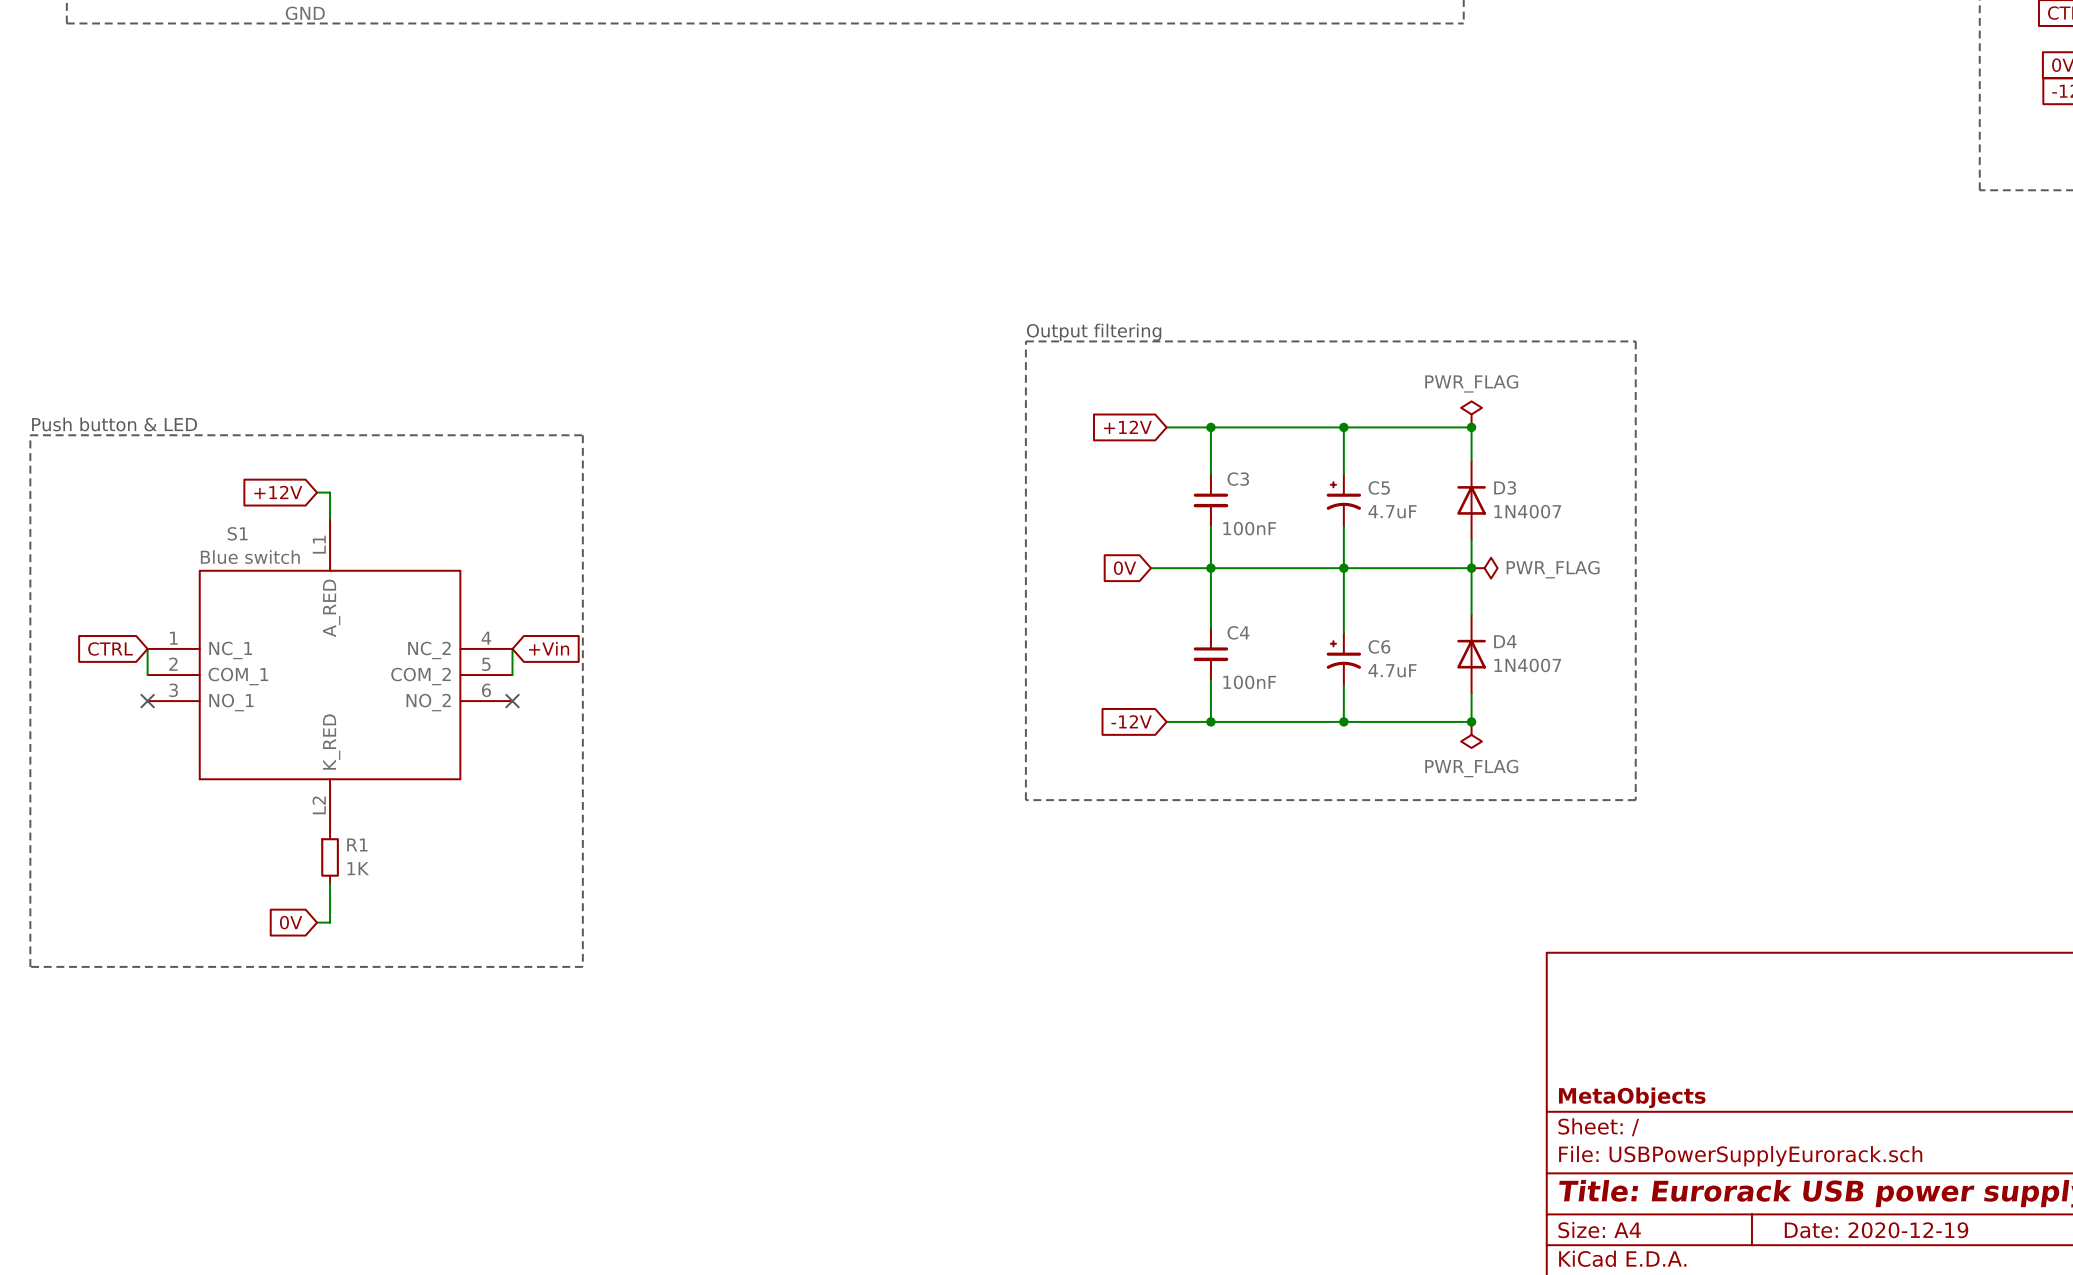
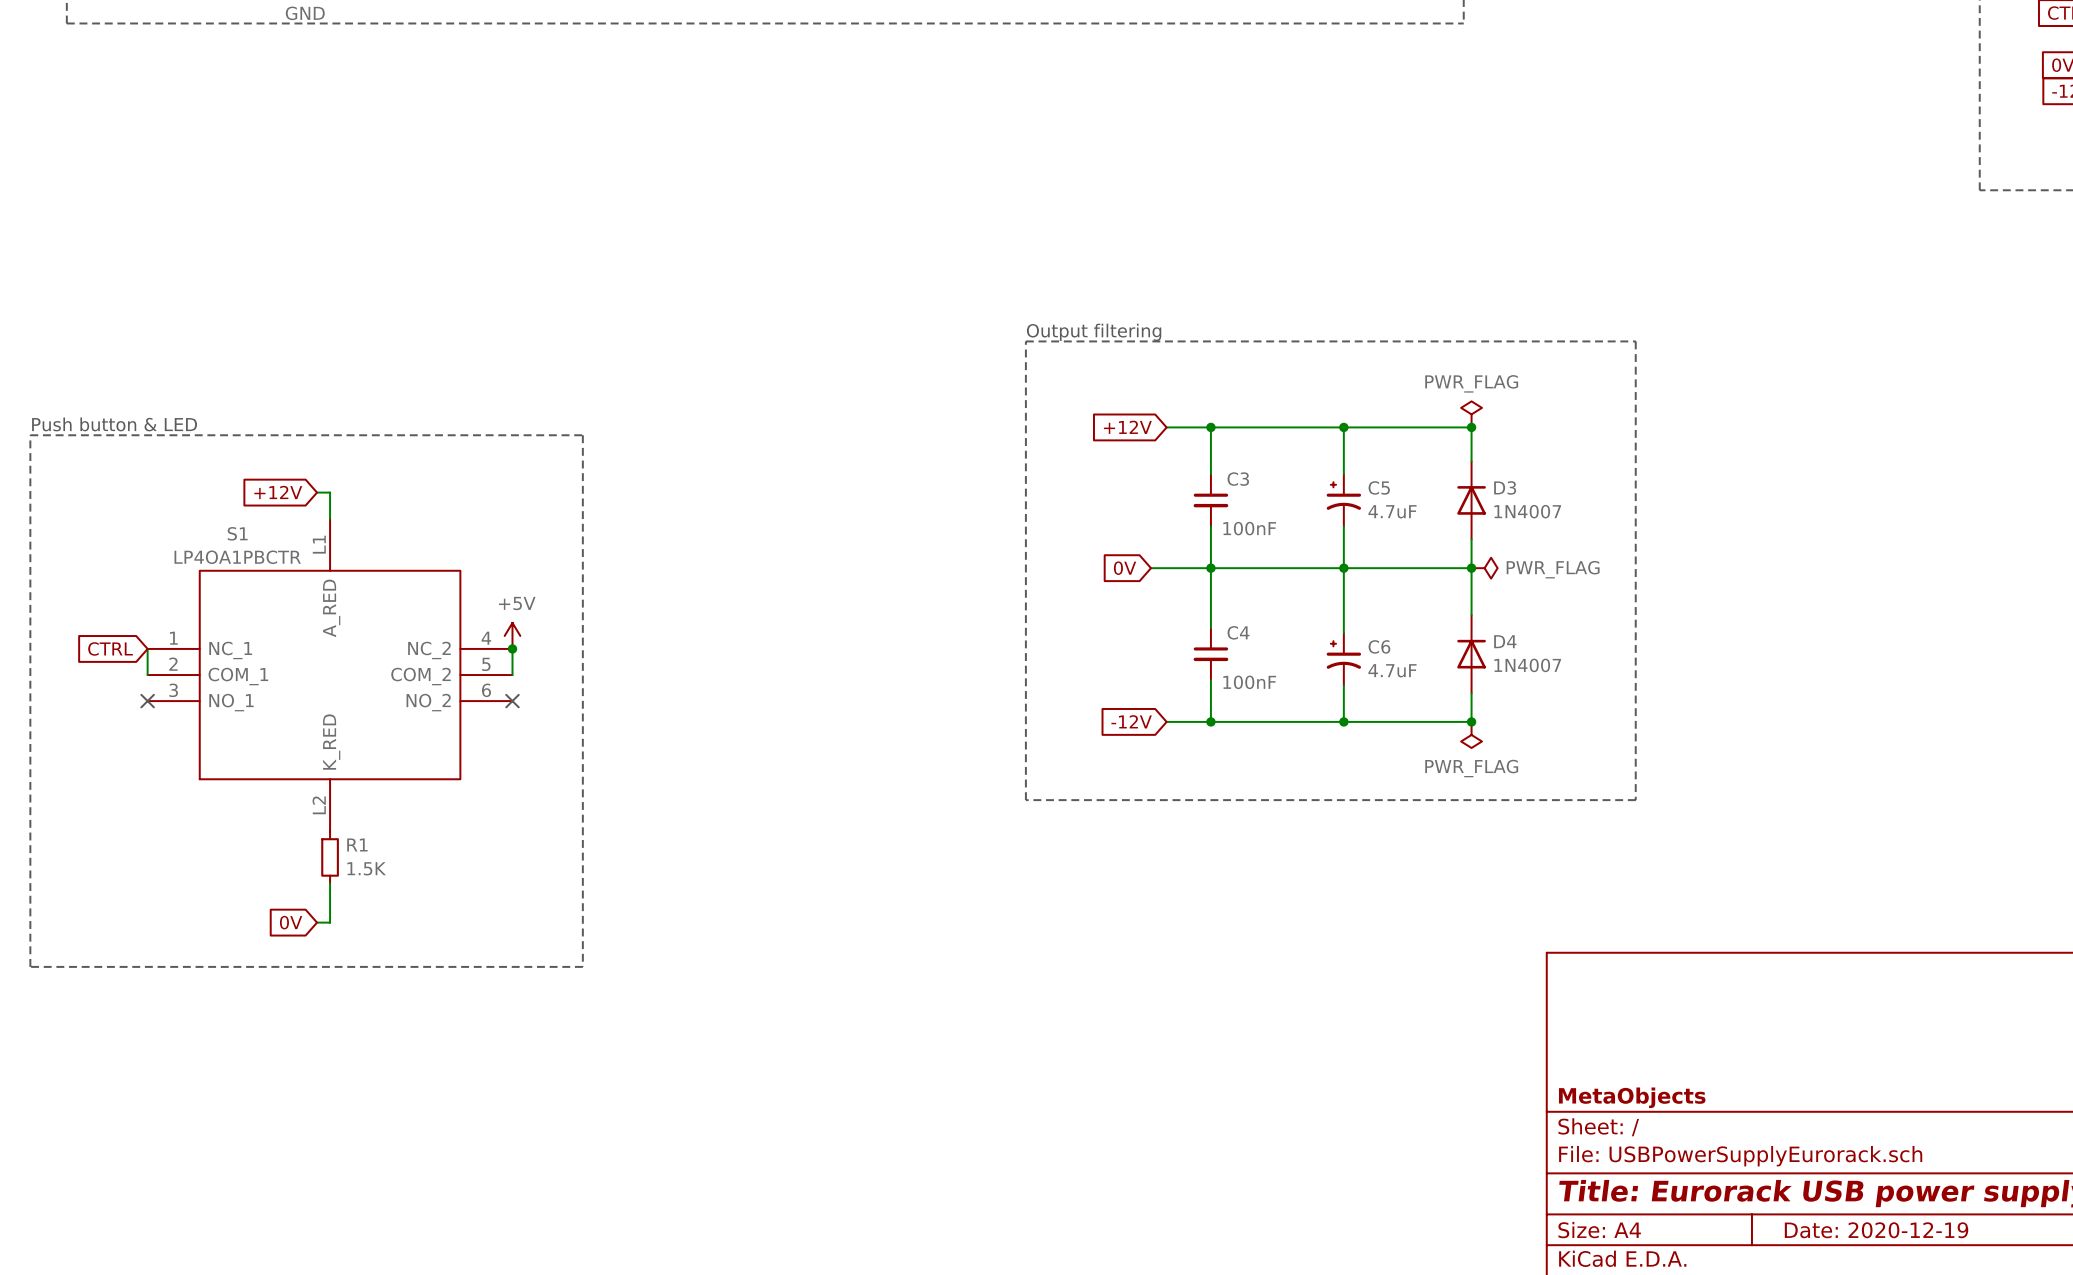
S1 value: Blue switch (250, 557) -> LP4OA1PBCTR (237, 557)
power symbol: none -> +5V (512, 635)
junction: none -> (512, 648)
global label: +Vin (549, 648) -> none
R1 value: 1K (358, 868) -> 1.5K (366, 868)

